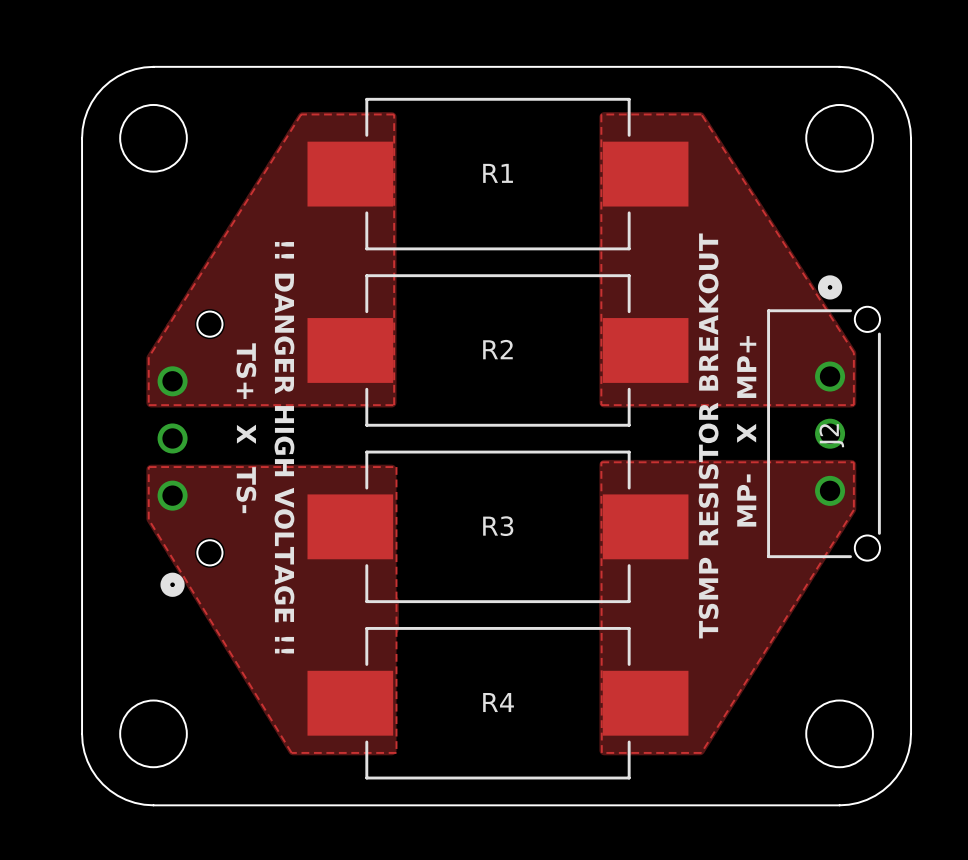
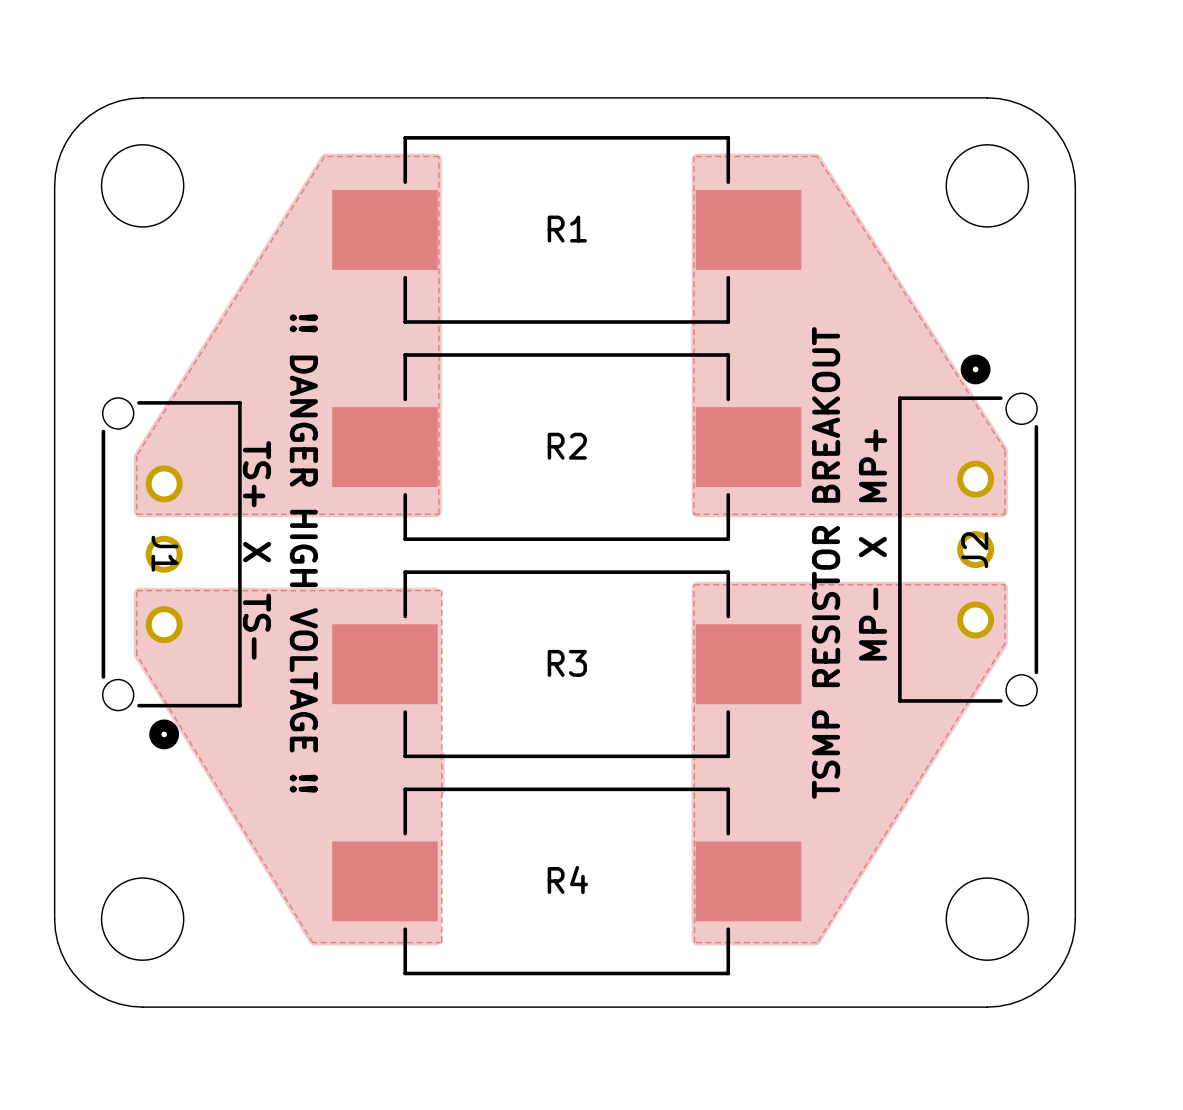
J1 side: bottom (190, 454) -> top (171, 573)

